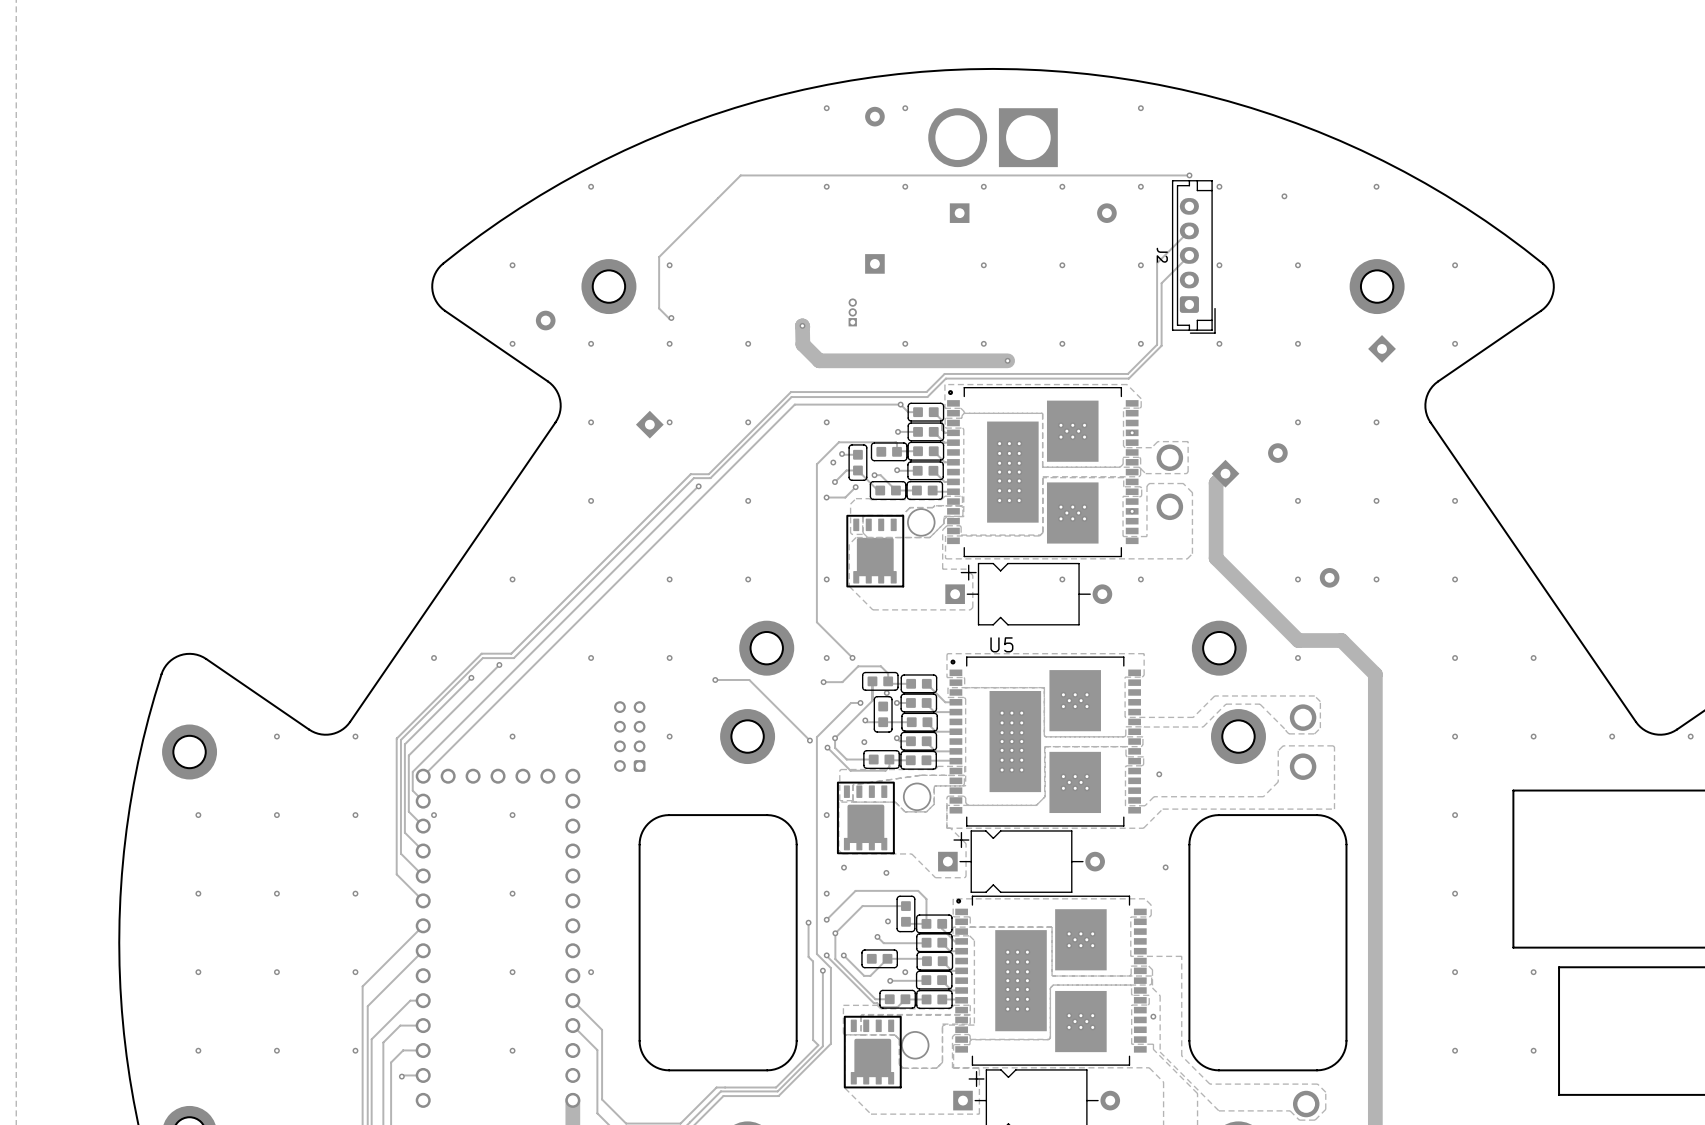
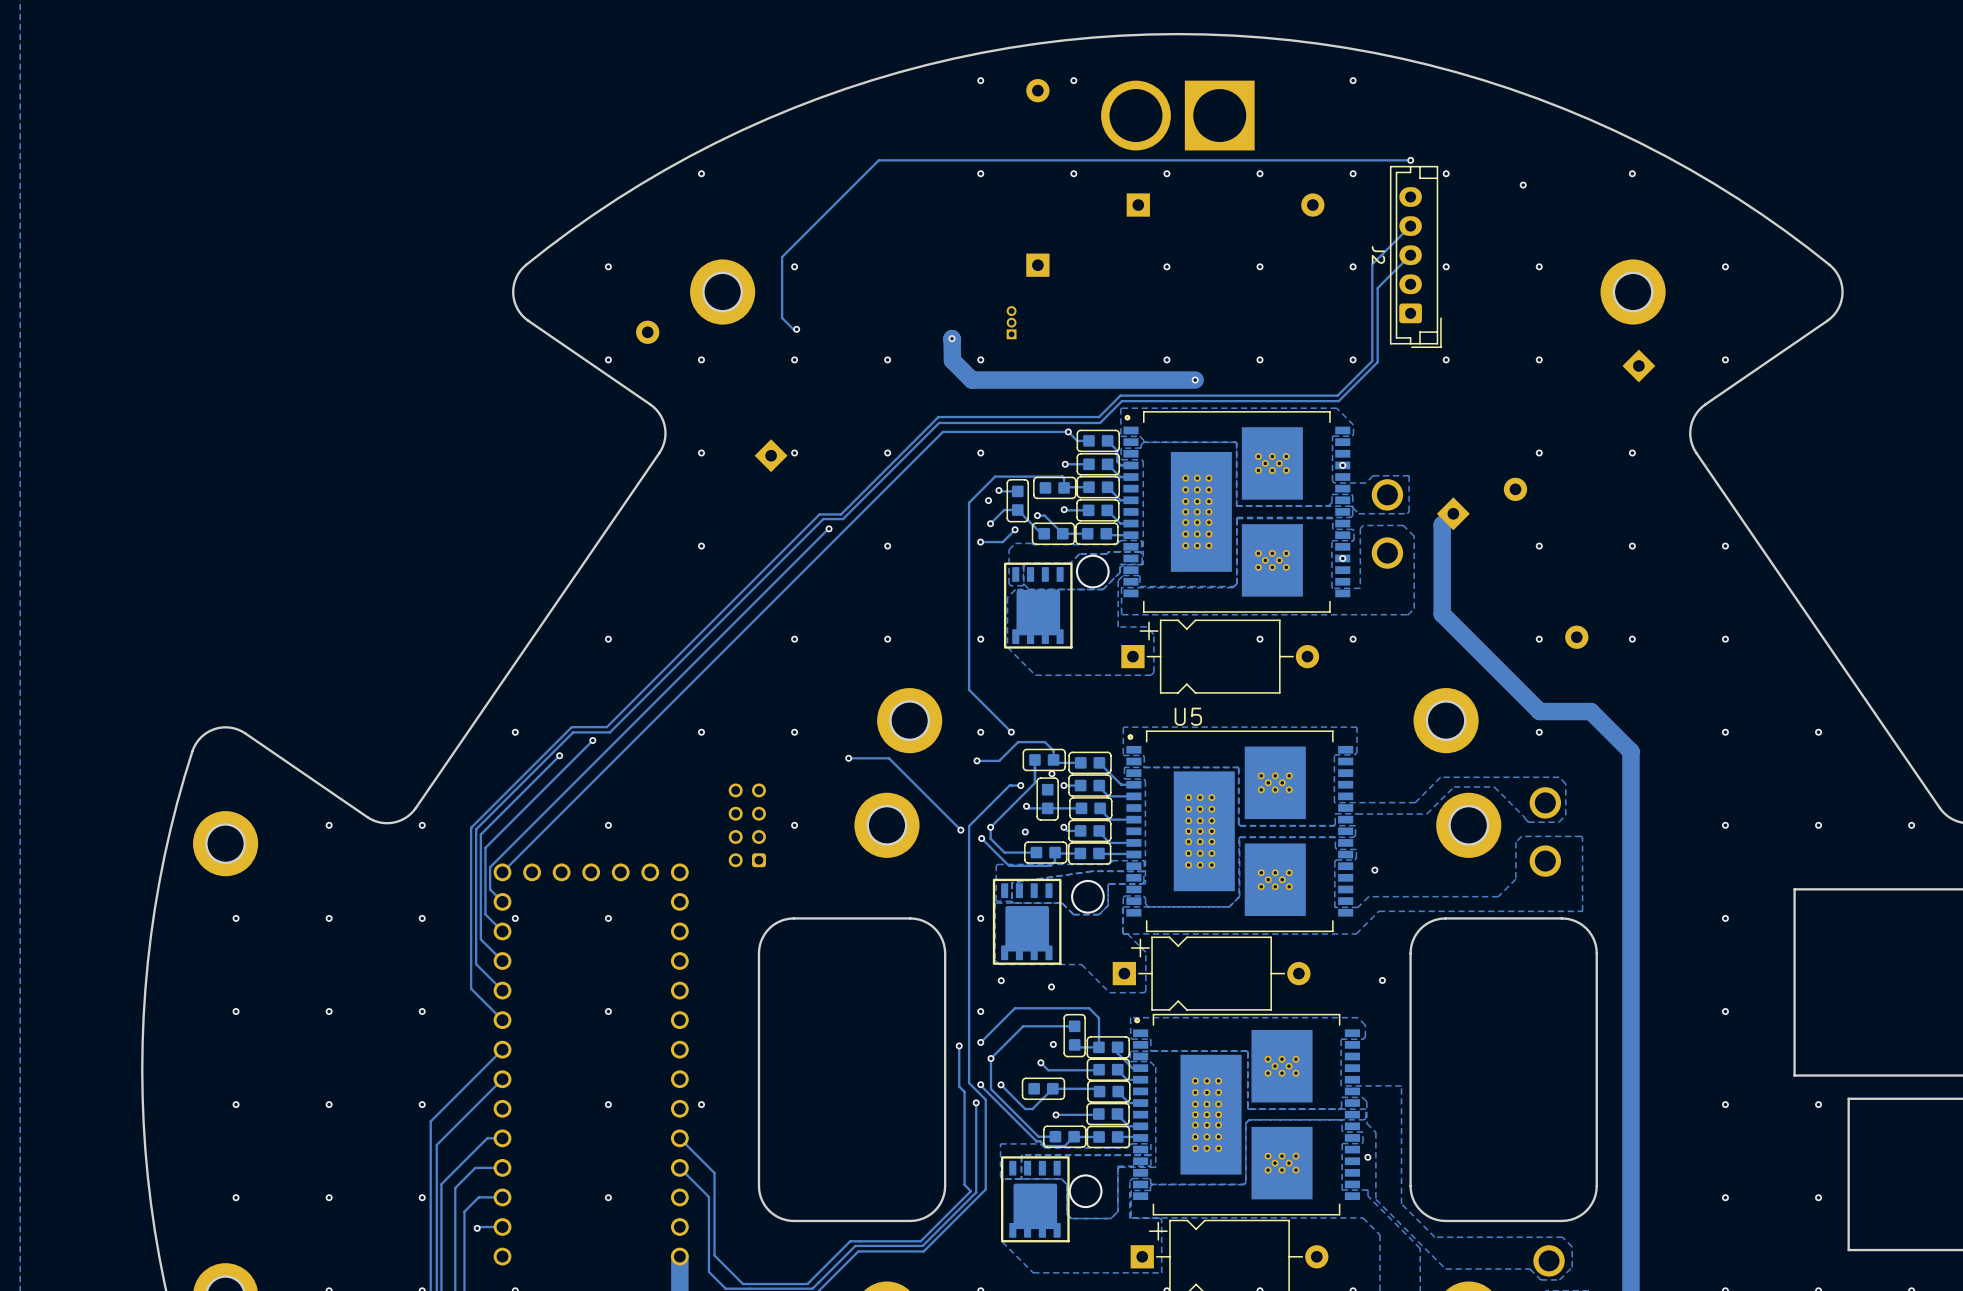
via: none -> (980, 359)
via: (905, 343) -> none
via: (905, 972) -> none

